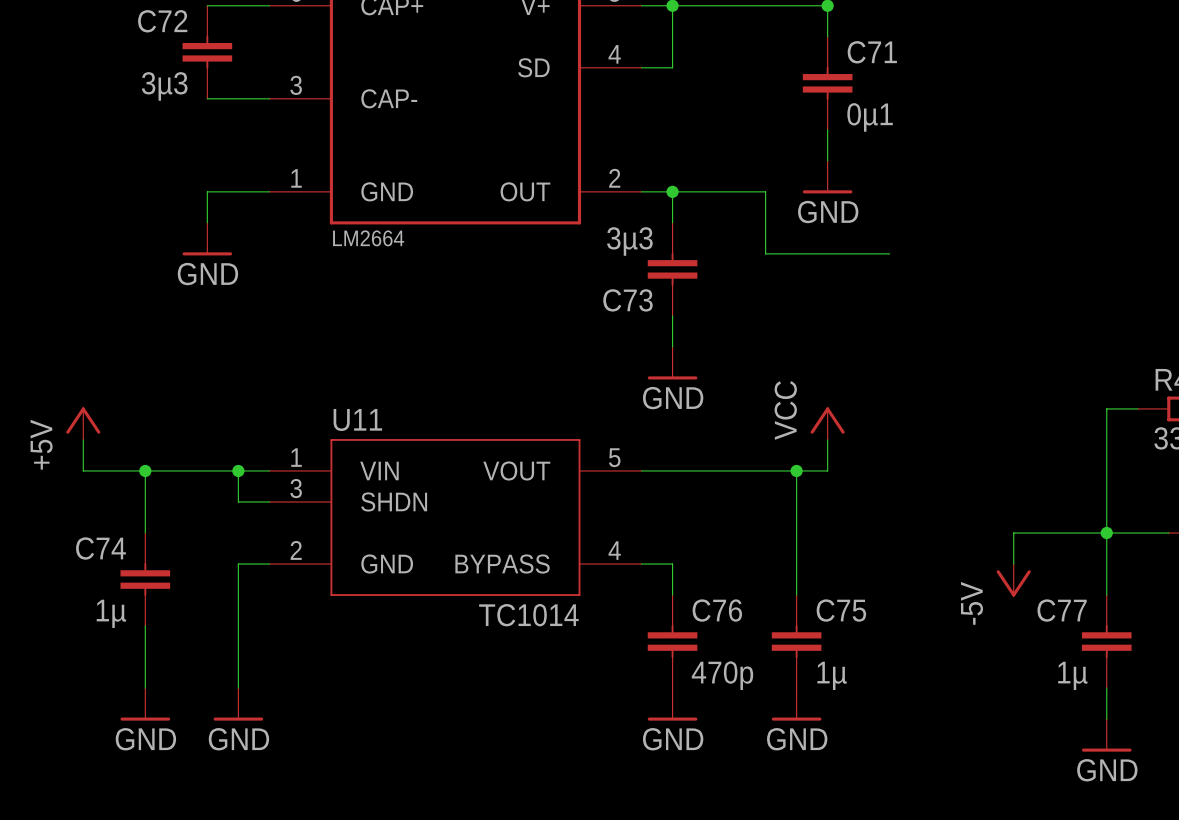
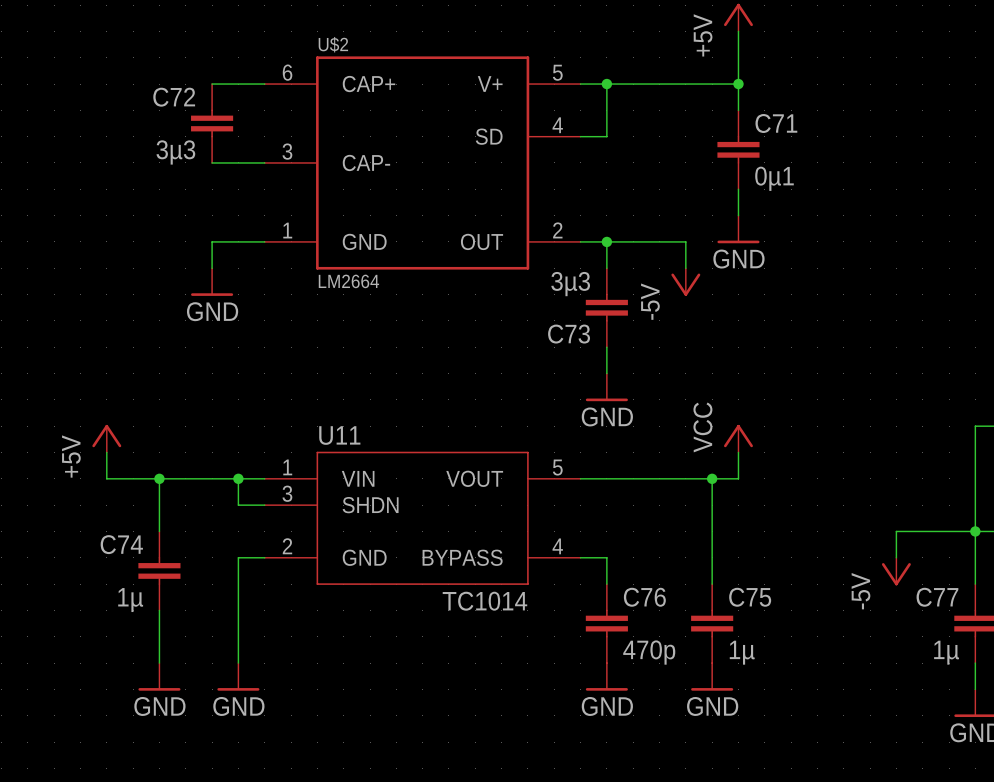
wire: (765, 222) (765, 253) (889, 253) -> none
power symbol: none -> -5V (685, 282)

